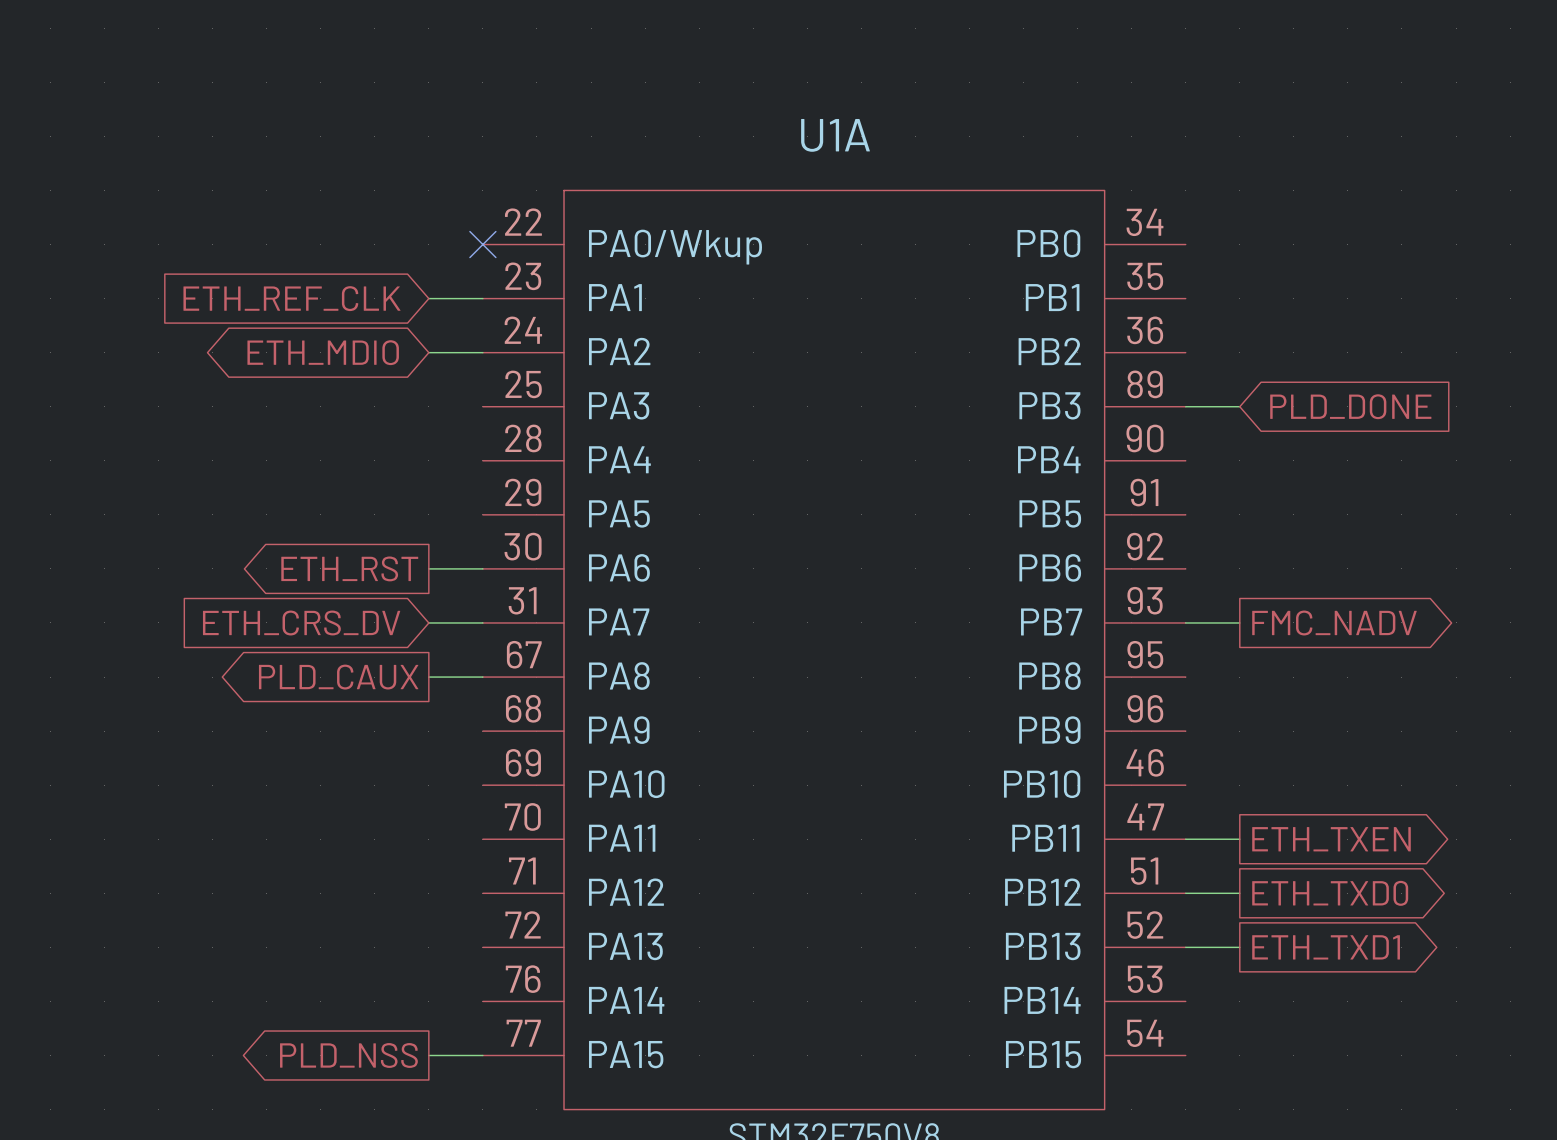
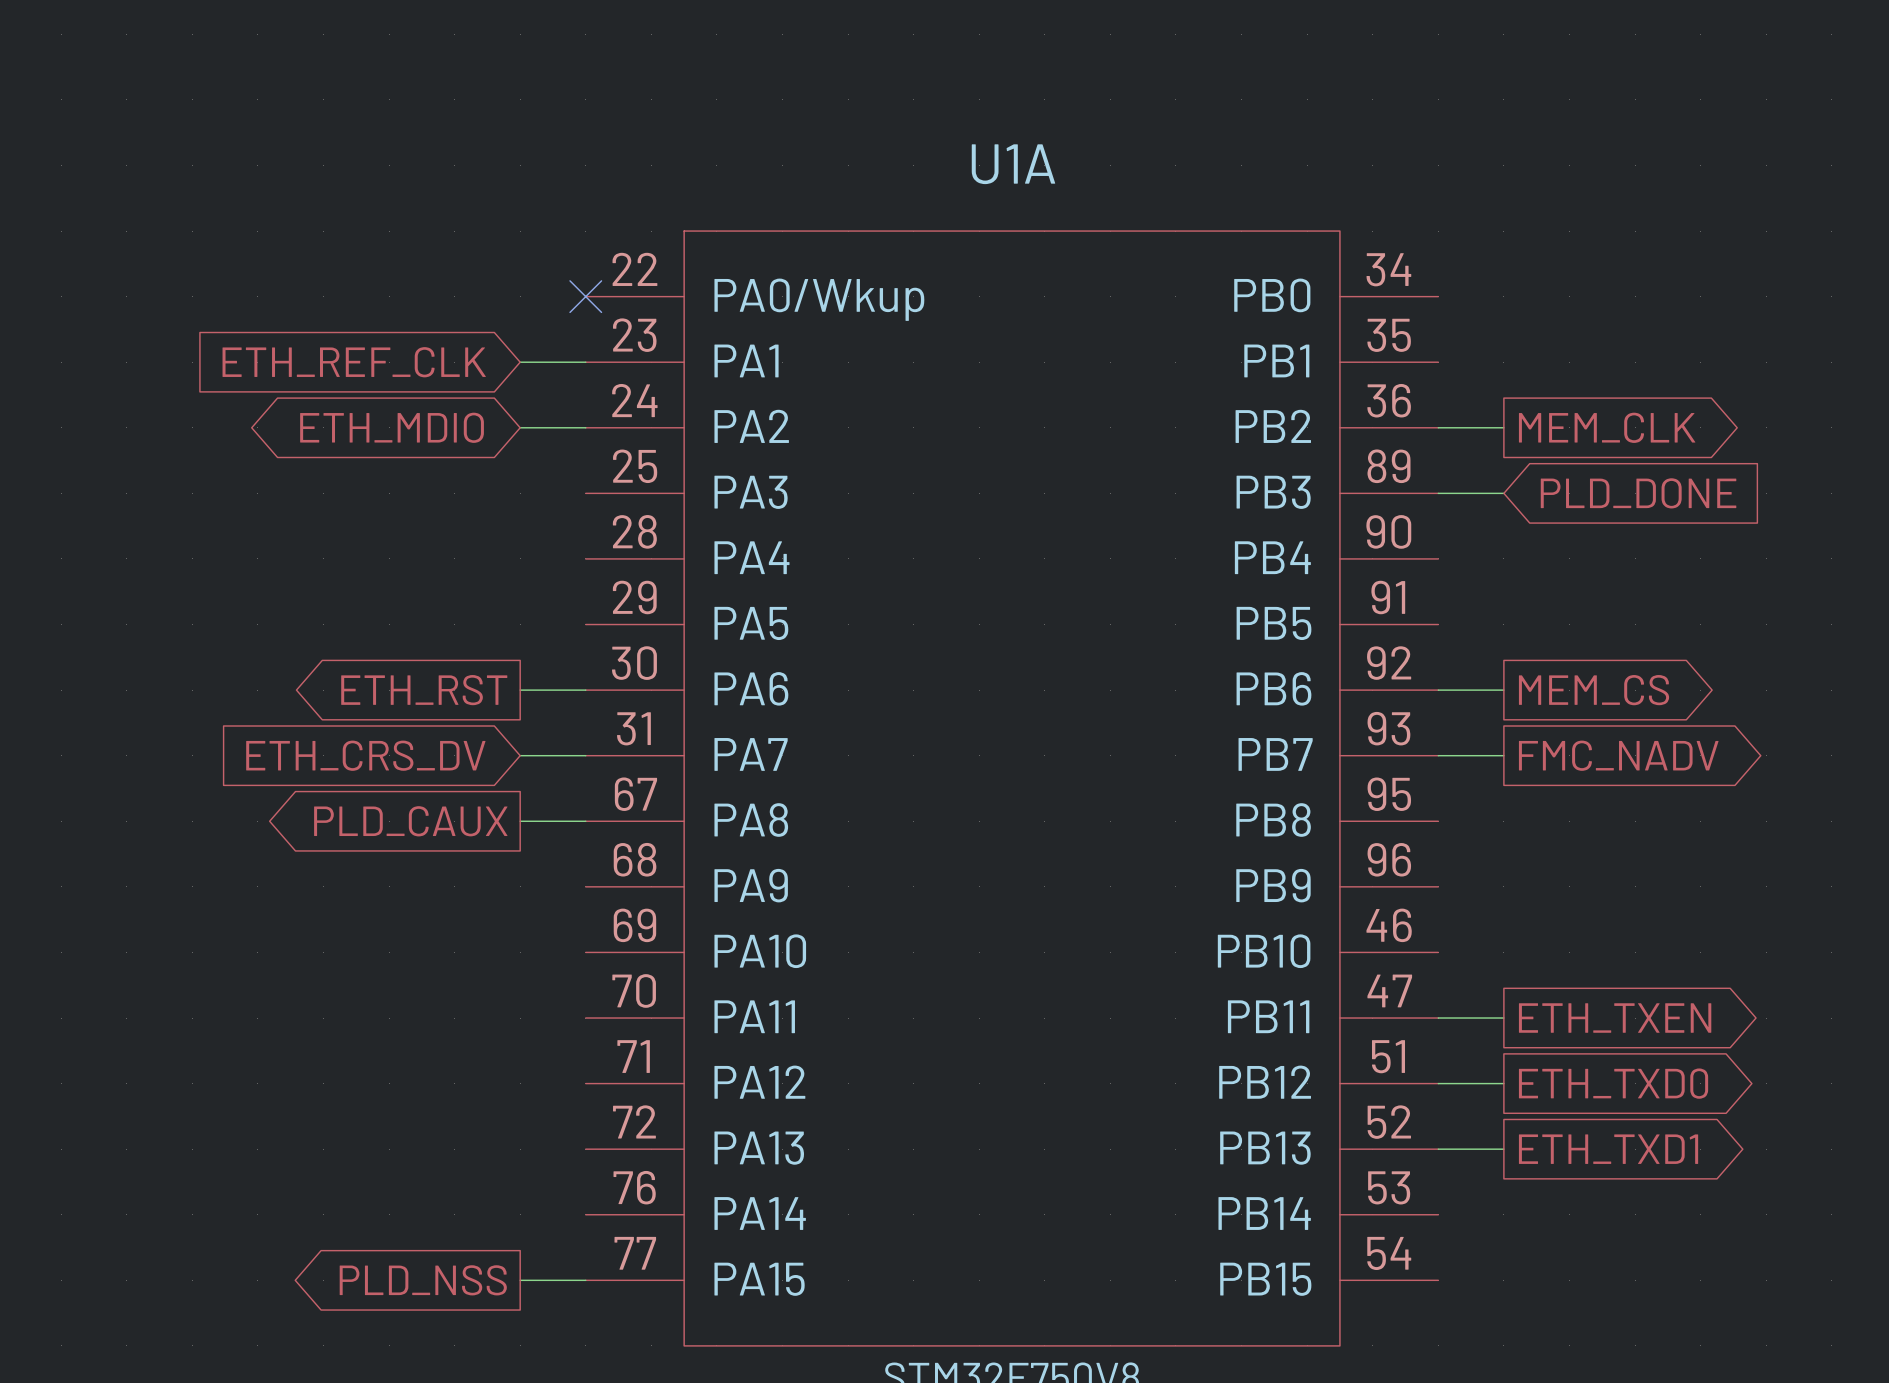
wire: none -> (1438, 427) (1503, 427)
global label: none -> MEM_CLK (1607, 427)
wire: none -> (1438, 690) (1503, 690)
global label: none -> MEM_CS (1594, 690)

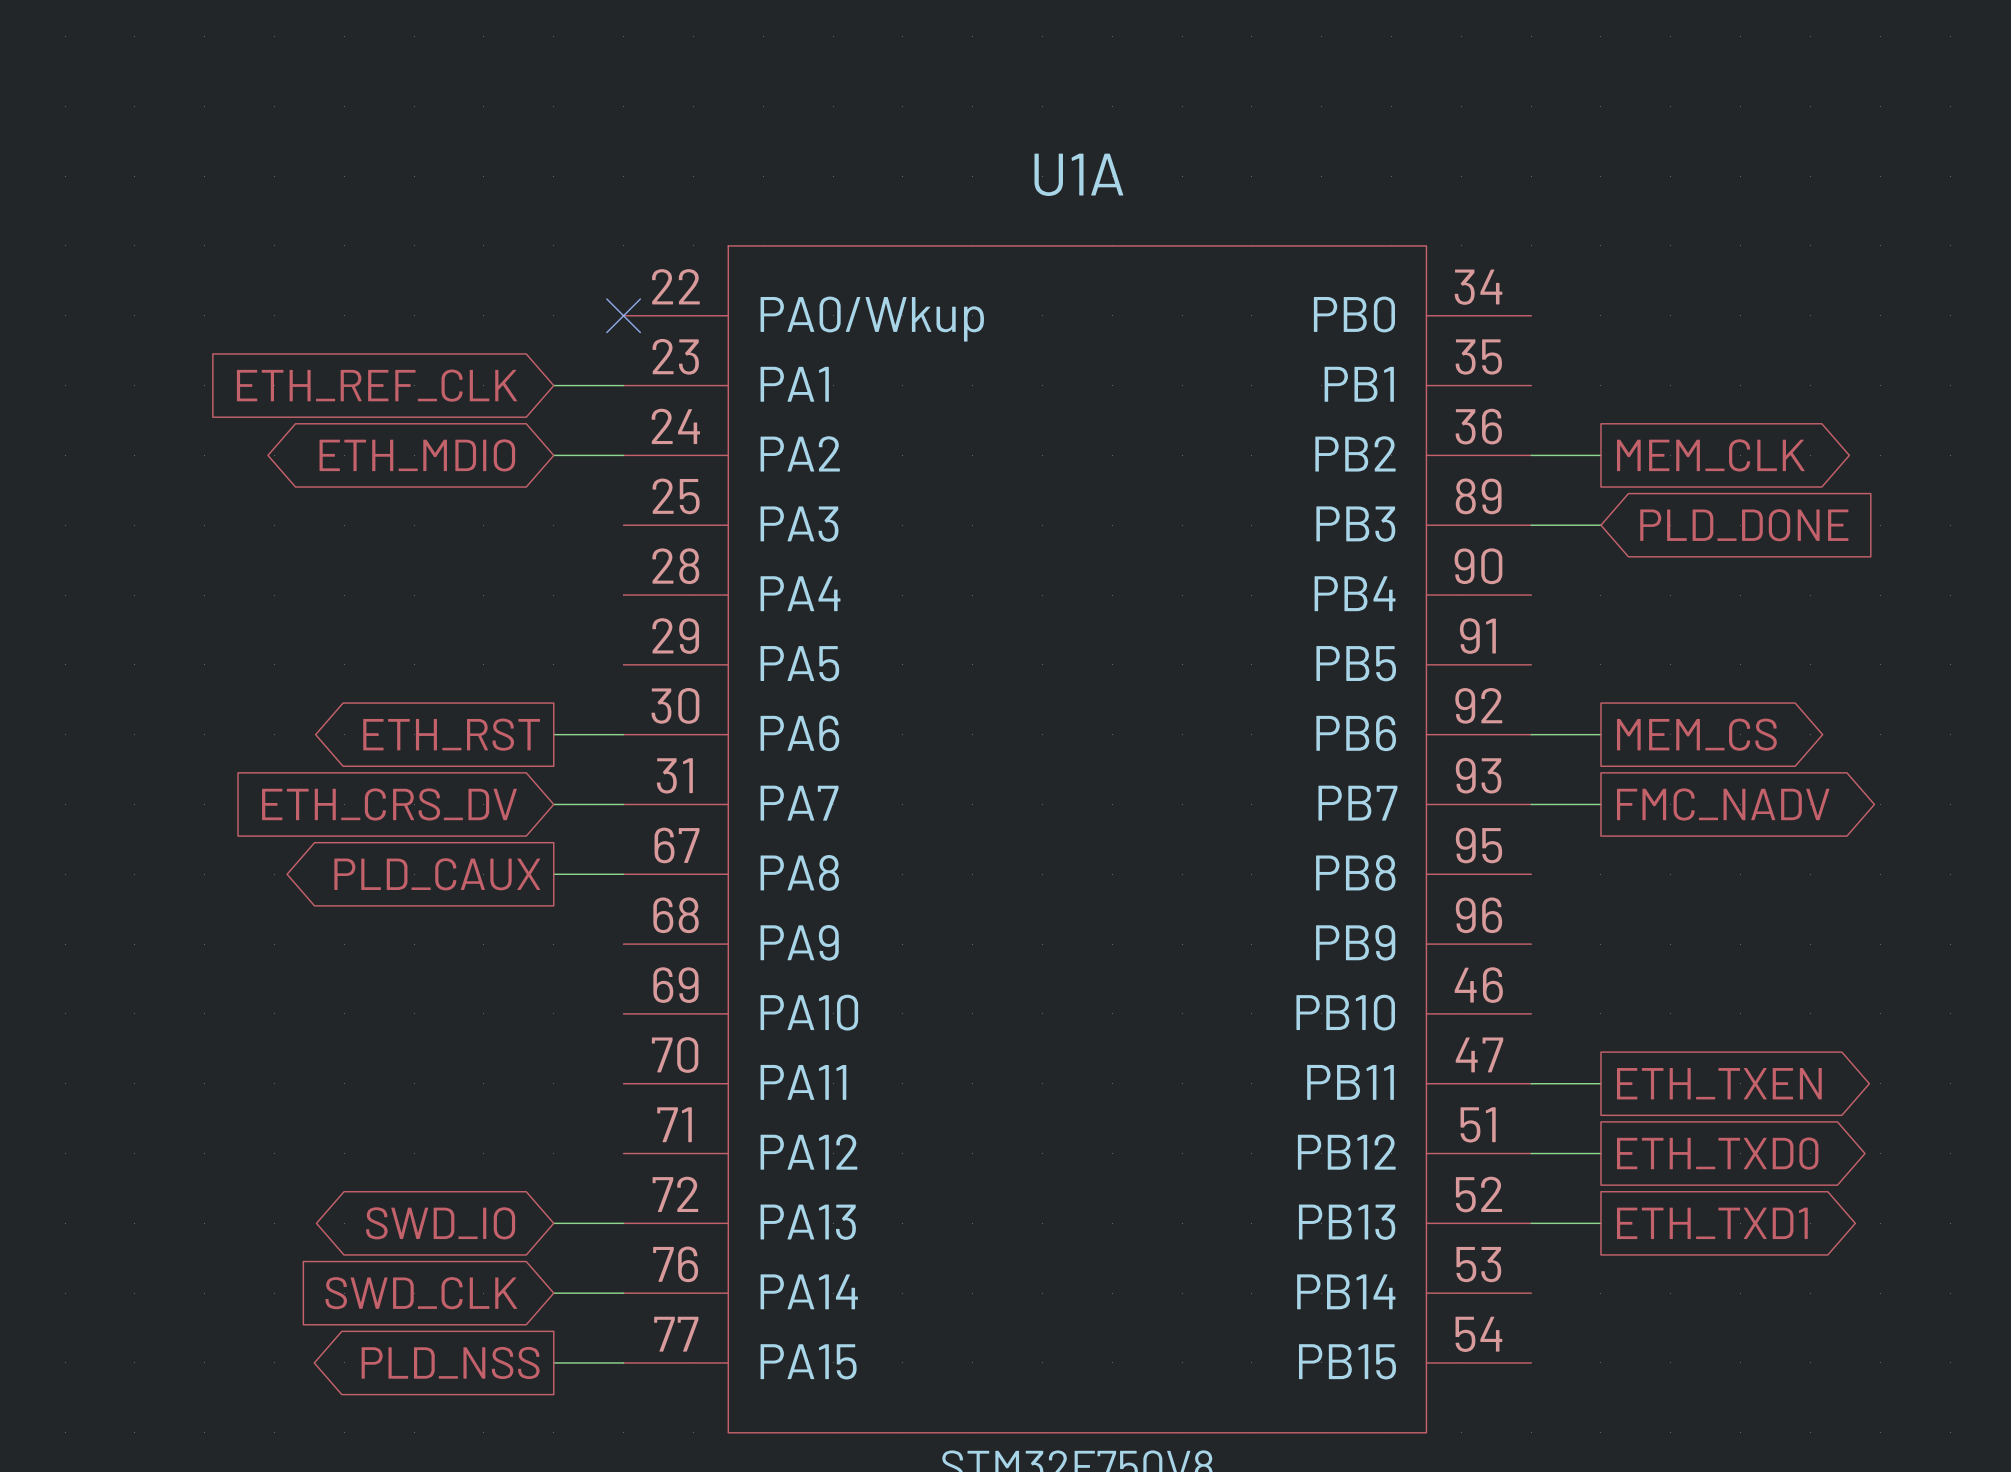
global label: none -> SWD_IO (440, 1223)
wire: none -> (553, 1223) (623, 1223)
global label: none -> SWD_CLK (421, 1293)
wire: none -> (553, 1293) (623, 1293)

